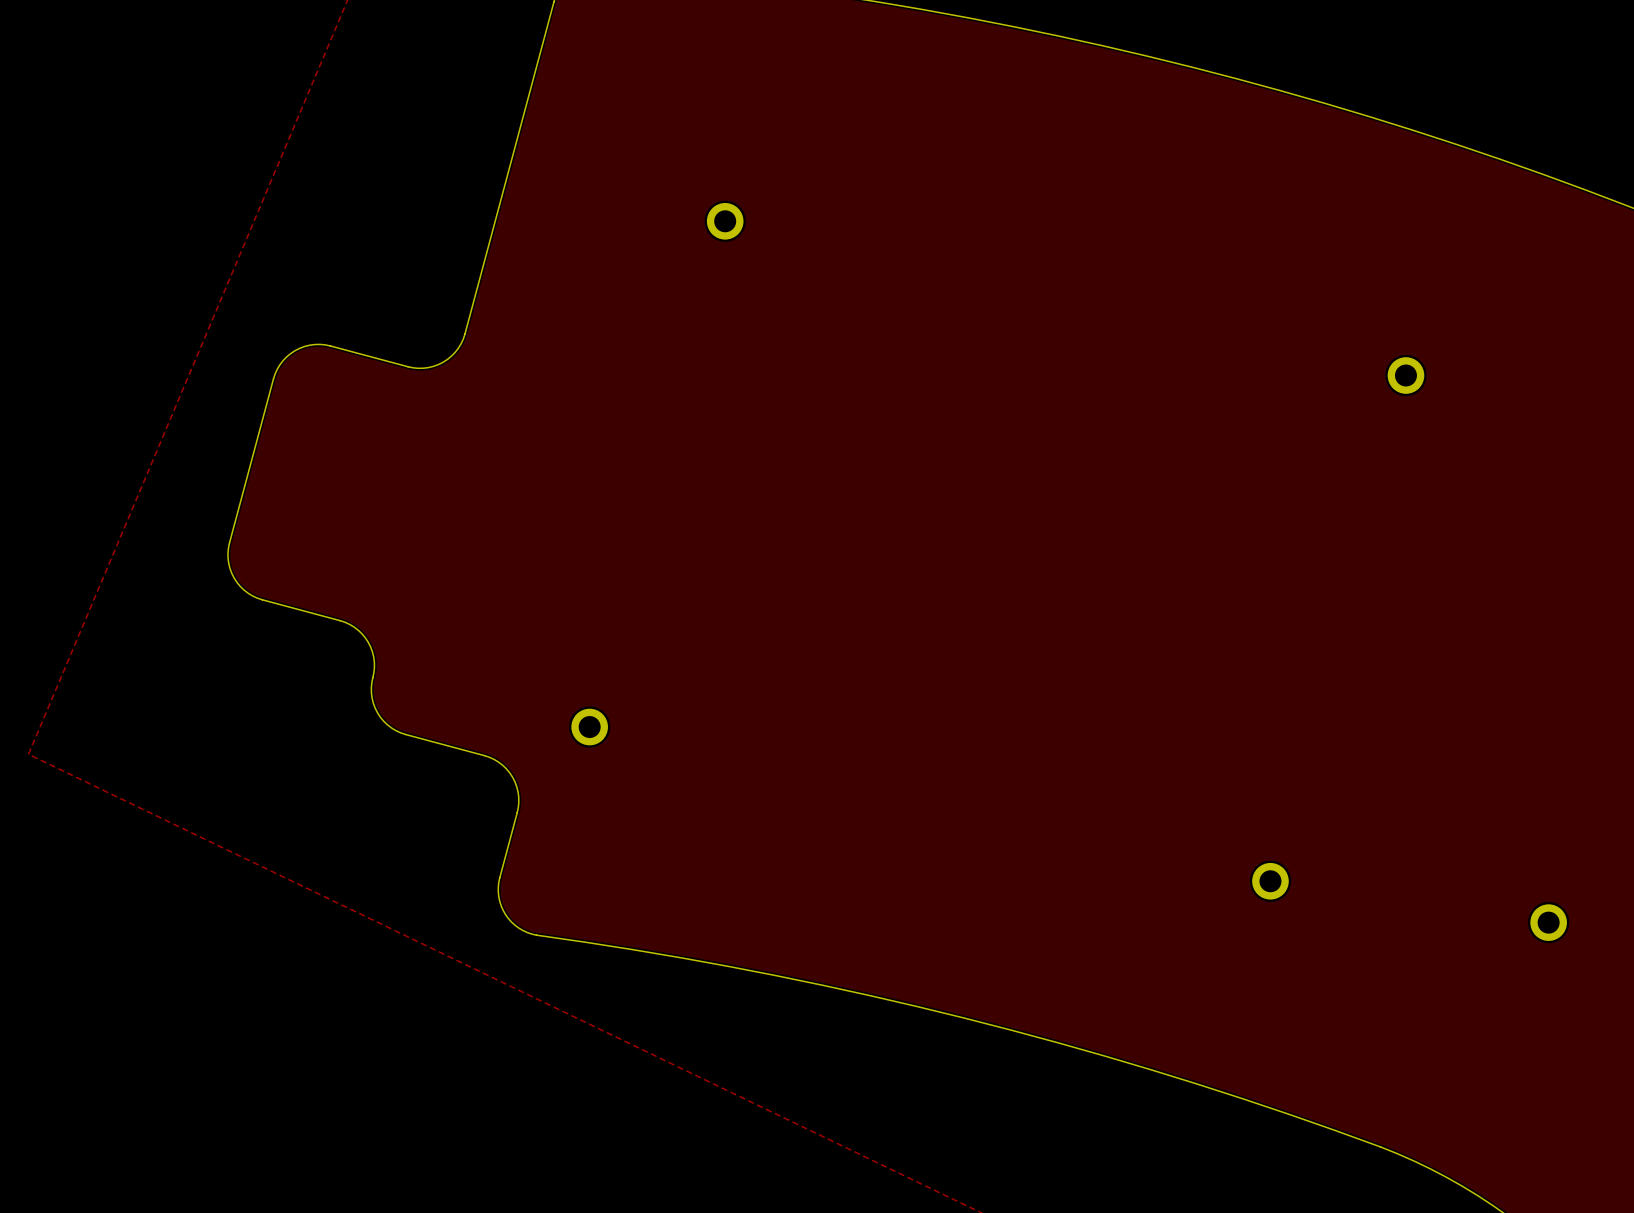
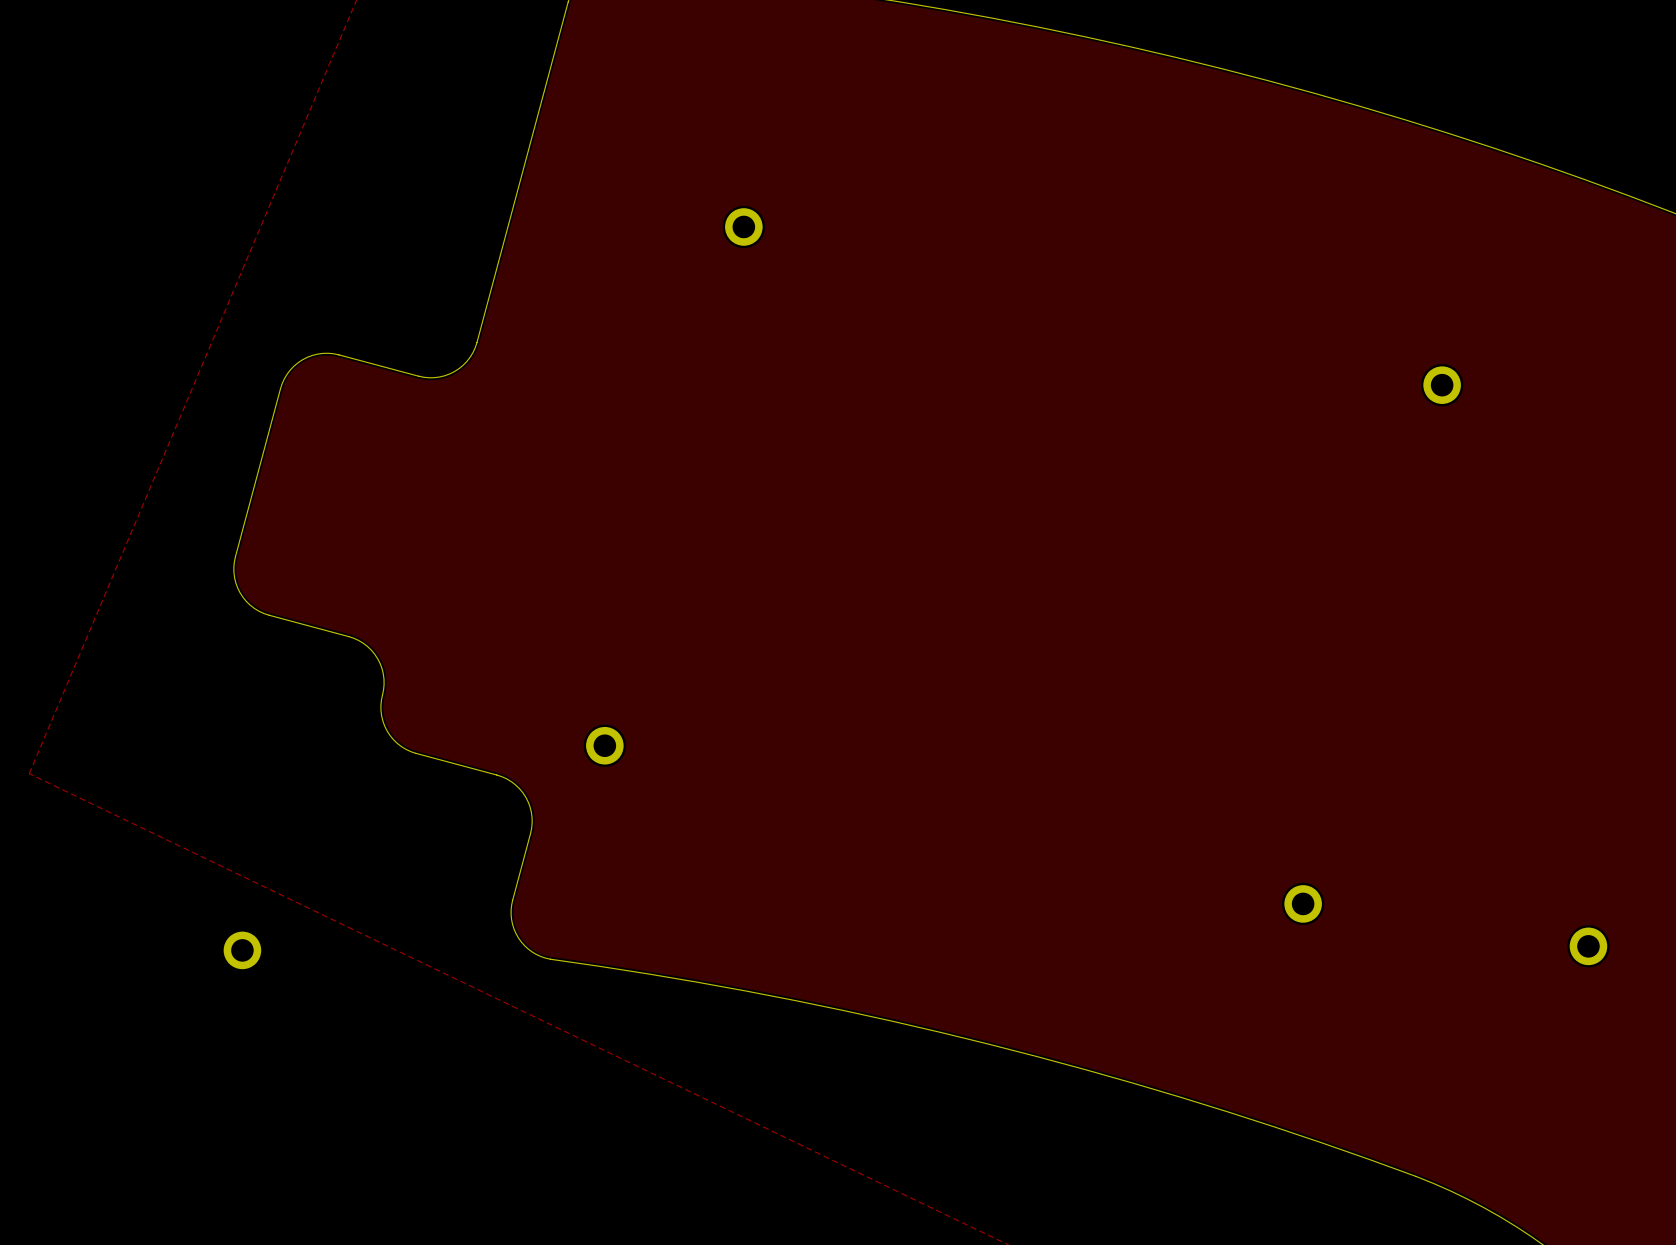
part: none -> (242, 950)

